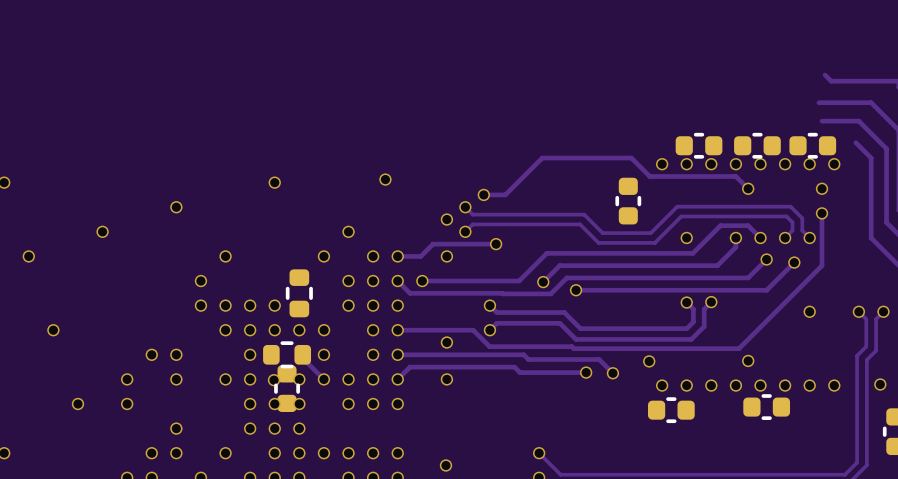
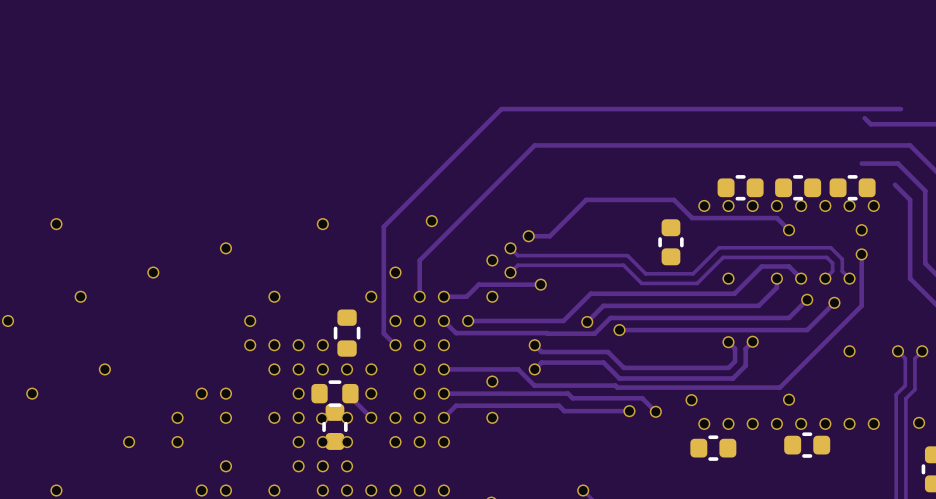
track: none -> (901, 109) (501, 109) (383, 226) (383, 333) (395, 345)
track: none -> (858, 145) (534, 145) (419, 260) (419, 296)

